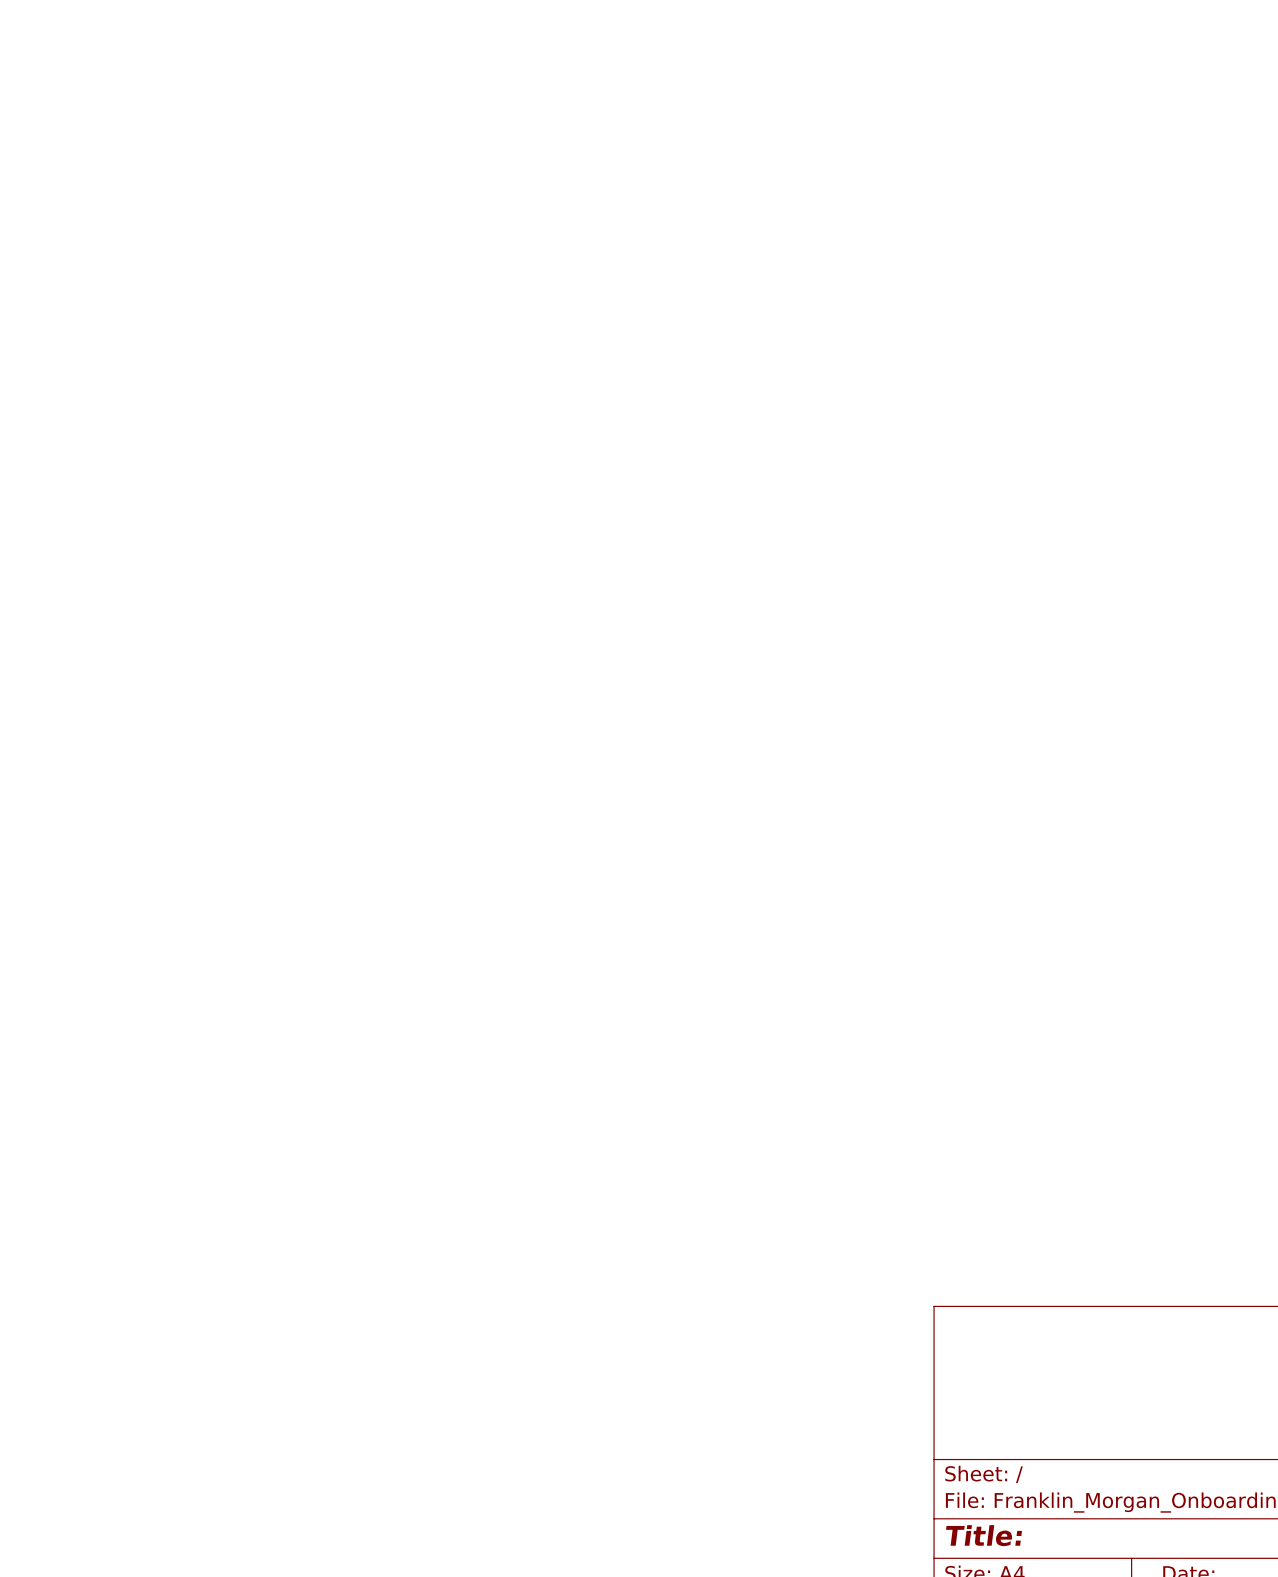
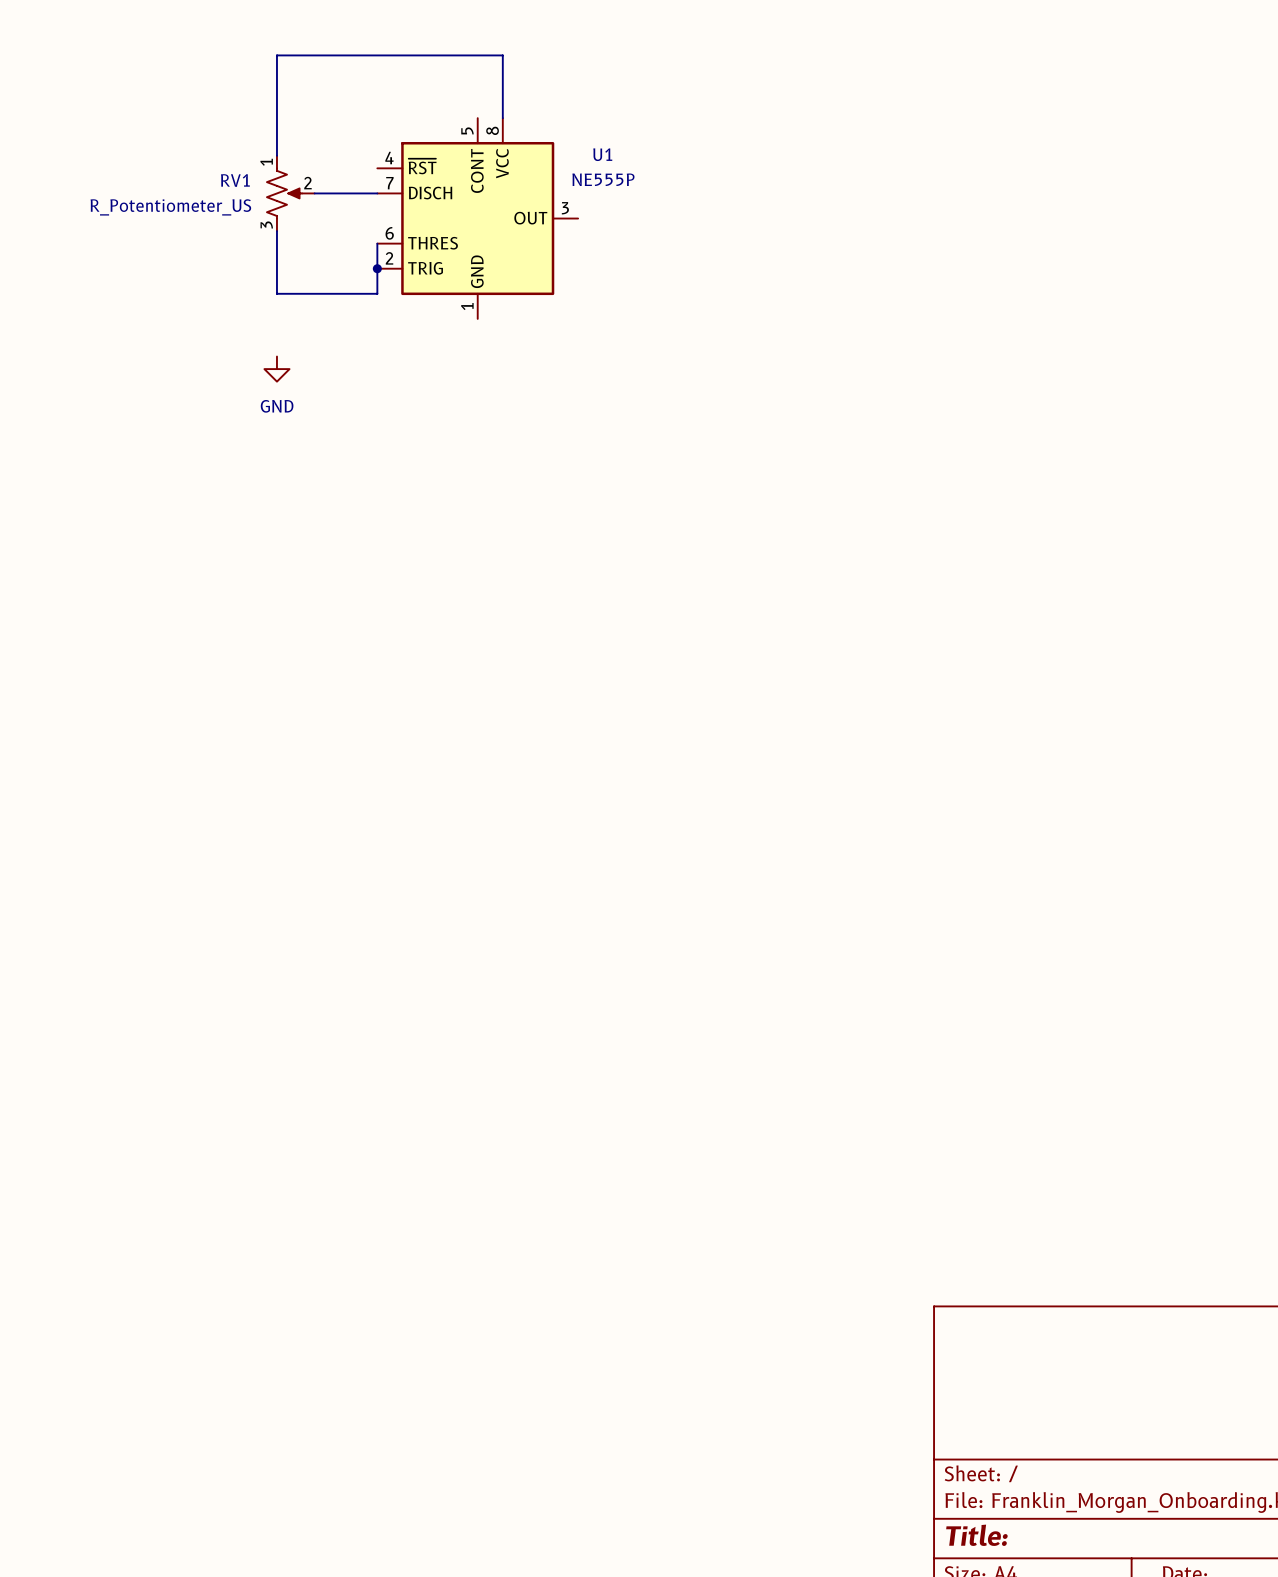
wire: none -> (502, 118) (502, 55) (276, 55) (276, 155)
RV1: none -> R_Potentiometer_US (290, 193)
wire: none -> (314, 193) (377, 193)
U1: none -> NE555P (477, 218)
wire: none -> (276, 231) (276, 293) (377, 293) (377, 243)
junction: none -> (377, 268)
power symbol: none -> GND (276, 369)

